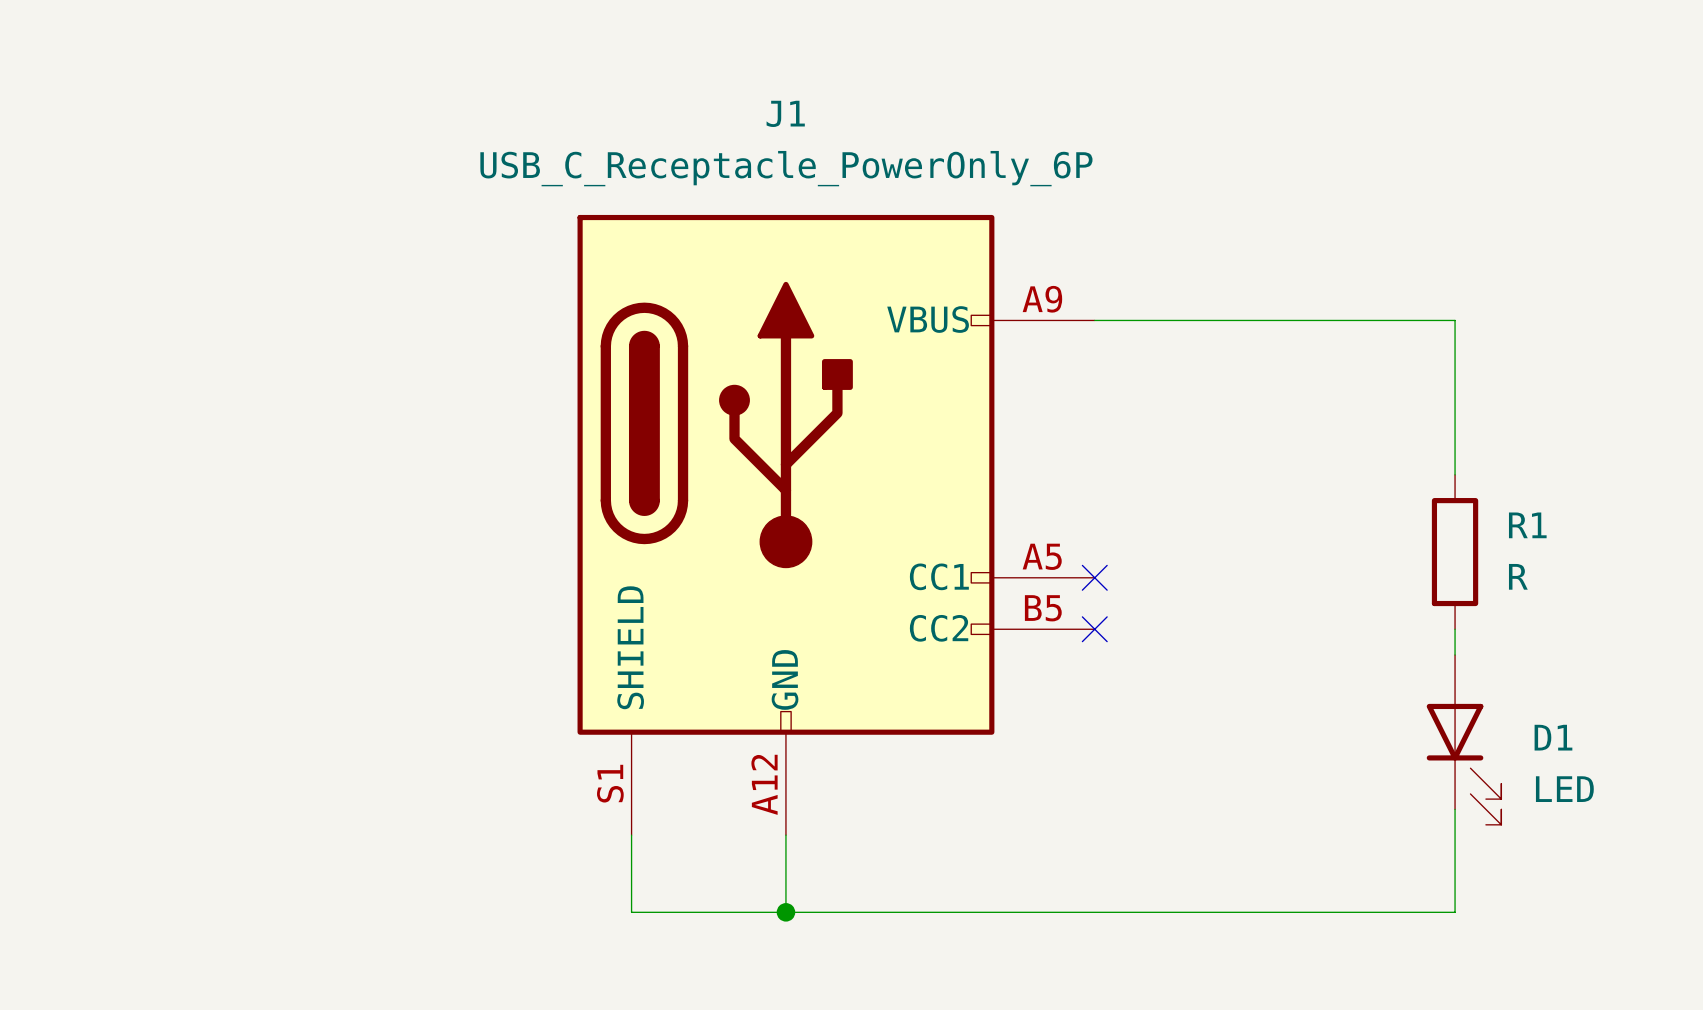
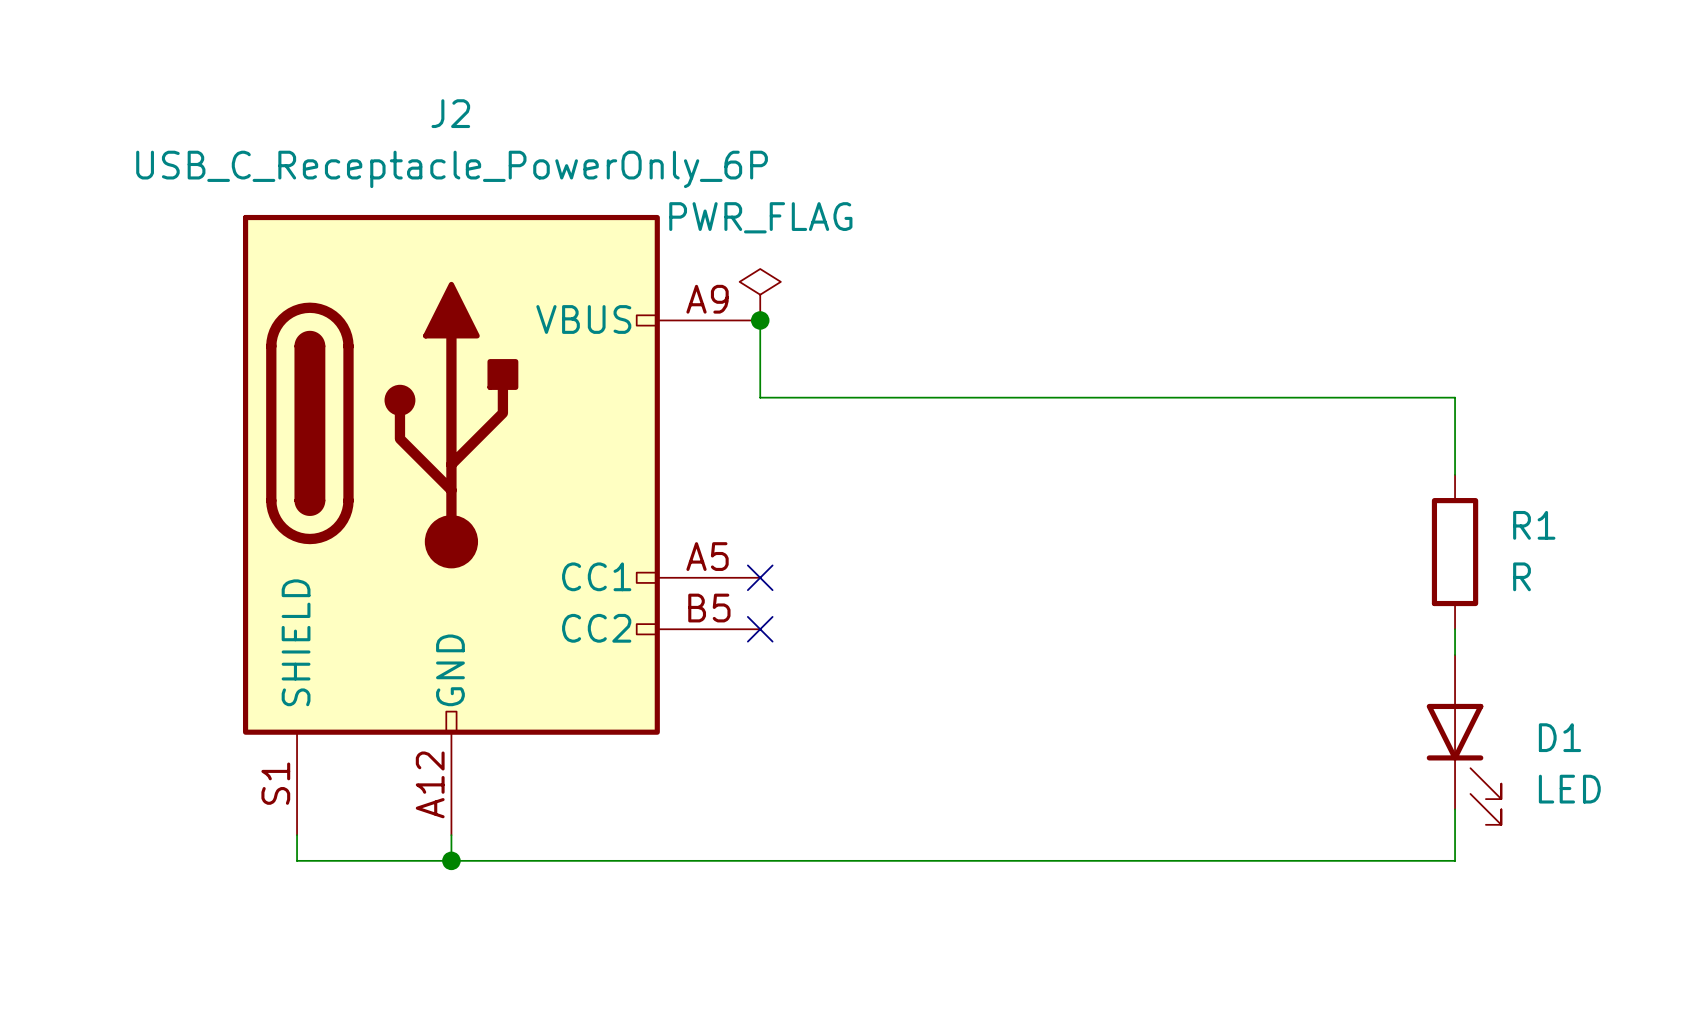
power symbol: none -> PWR_FLAG (760, 294)
junction: none -> (760, 320)
wire: (1094, 320) (1455, 320) (1455, 397) -> (760, 320) (760, 397) (1455, 397)
J2: none -> USB_C_Receptacle_PowerOnly_6P (501, 525)
J1: USB_C_Receptacle_PowerOnly_6P (836, 525) -> none
no-connect mark: none -> (760, 577)
no-connect mark: (1094, 577) -> none
no-connect mark: none -> (760, 629)
no-connect mark: (1094, 629) -> none
wire: none -> (451, 835) (451, 860)
wire: (631, 835) (631, 912) (1455, 912) (1455, 860) -> (297, 835) (297, 860) (1455, 860)
wire: (785, 835) (785, 912) -> none
junction: none -> (451, 860)
junction: (785, 912) -> none

